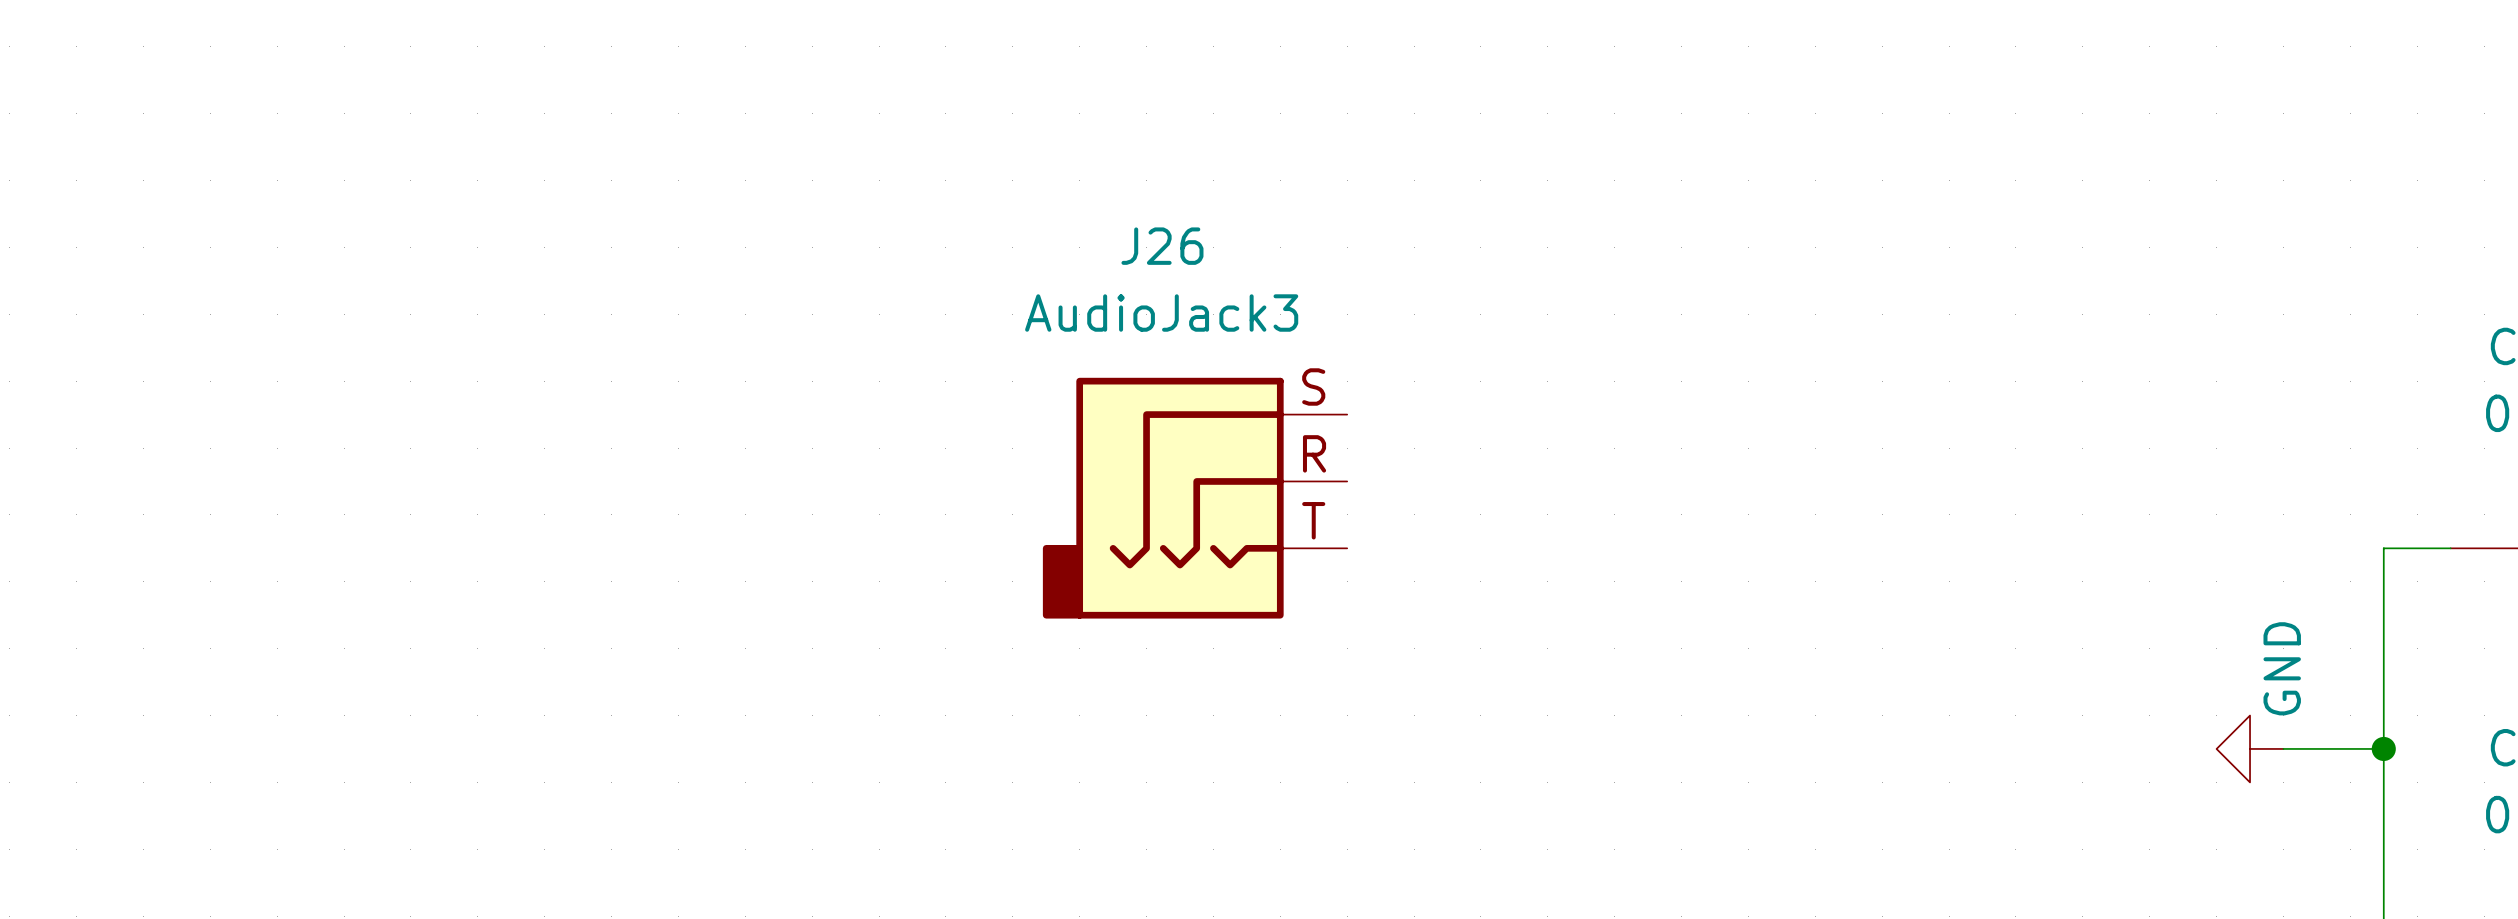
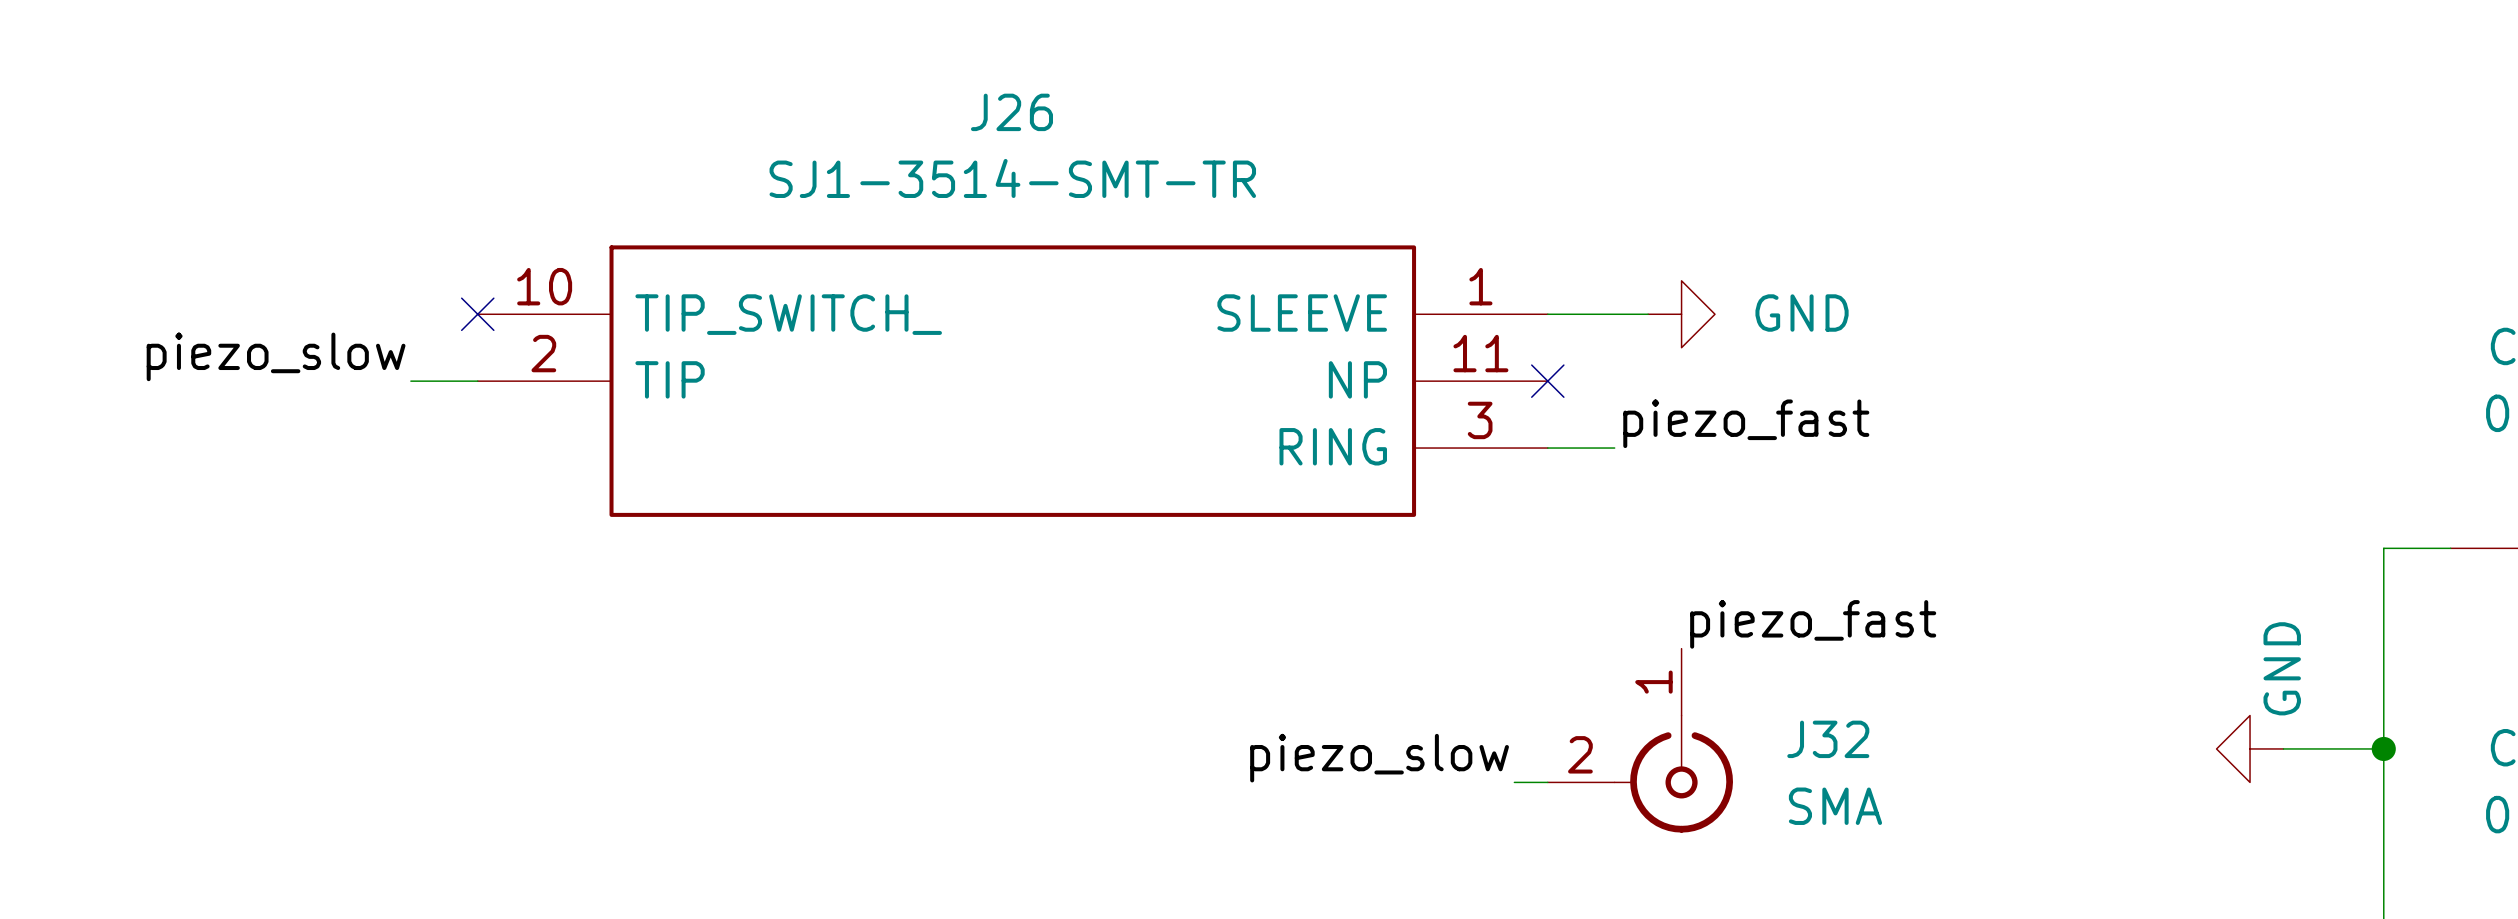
J26 value: AudioJack3 (1161, 313) -> SJ1-3514-SMT-TR (1012, 178)
no-connect mark: none -> (477, 314)
wire: none -> (1547, 314) (1648, 314)
power symbol: none -> GND (1681, 314)
label: none -> piezo_slow (276, 356)
J26 symbol: [1042, 377, 1348, 619] -> [477, 245, 1548, 517]
wire: none -> (410, 381) (477, 381)
no-connect mark: none -> (1547, 381)
label: none -> piezo_fast (1746, 423)
wire: none -> (1547, 448) (1614, 448)
label: none -> piezo_fast (1813, 624)
J32: none -> SMA (1640, 740)
label: none -> piezo_slow (1379, 758)
wire: none -> (1514, 782) (1547, 782)

